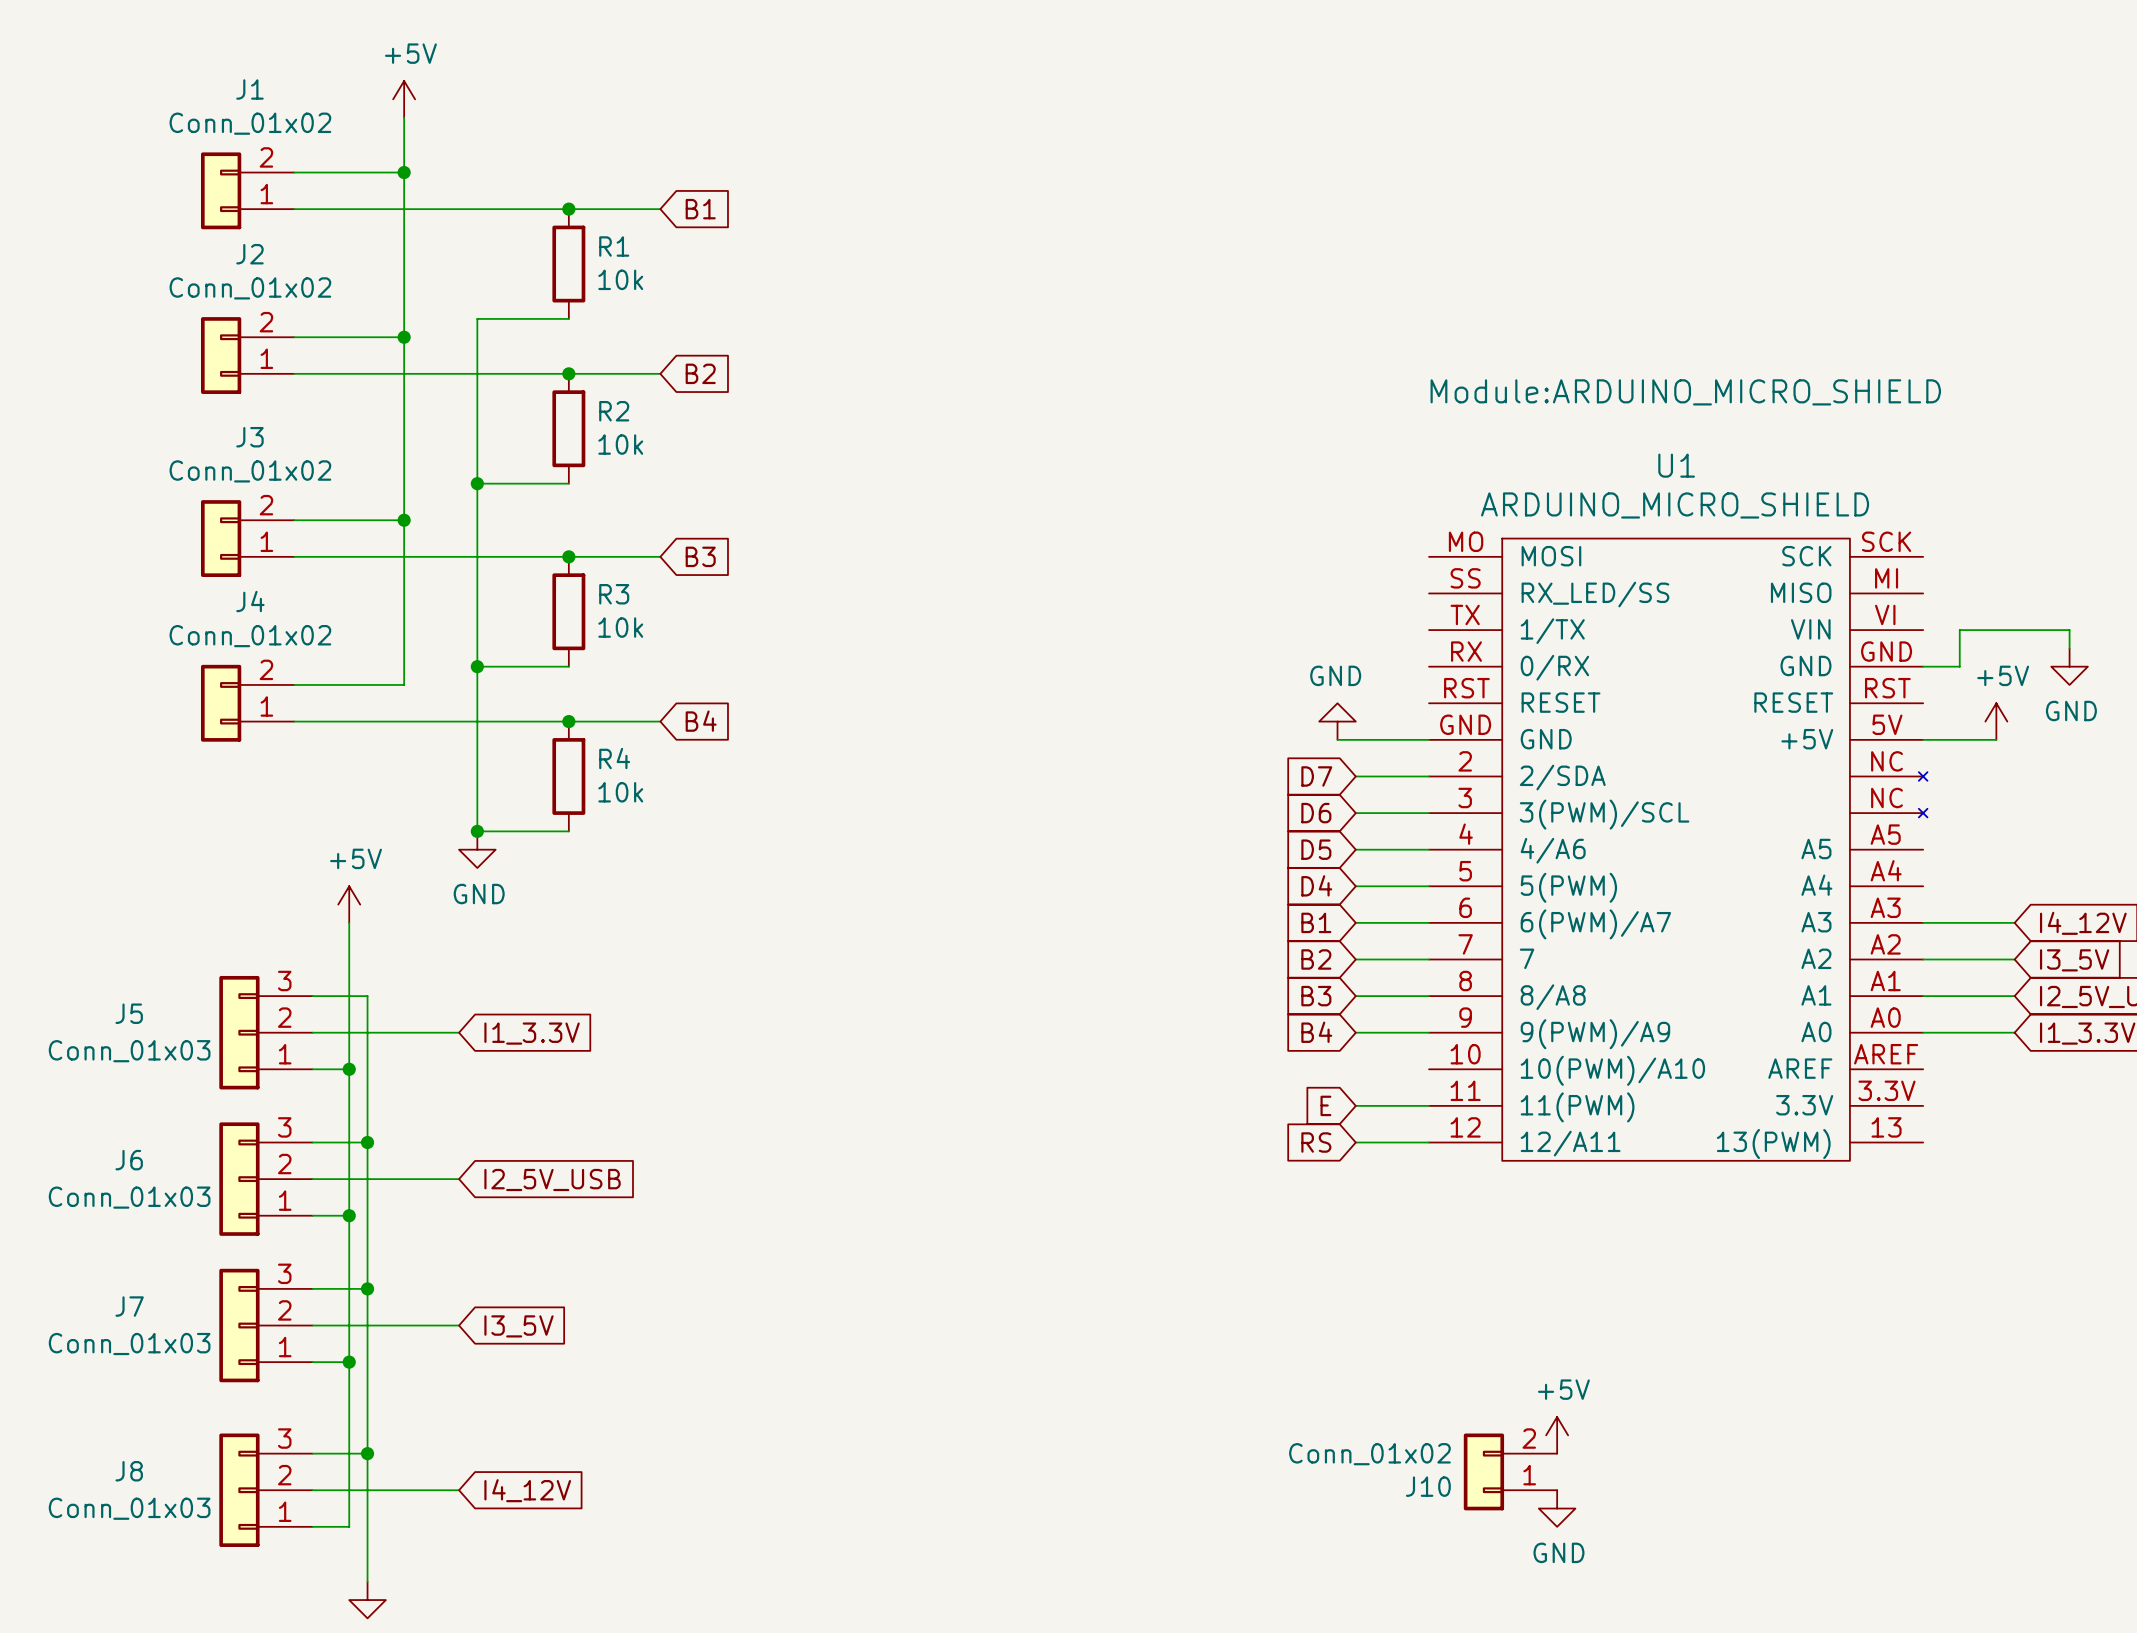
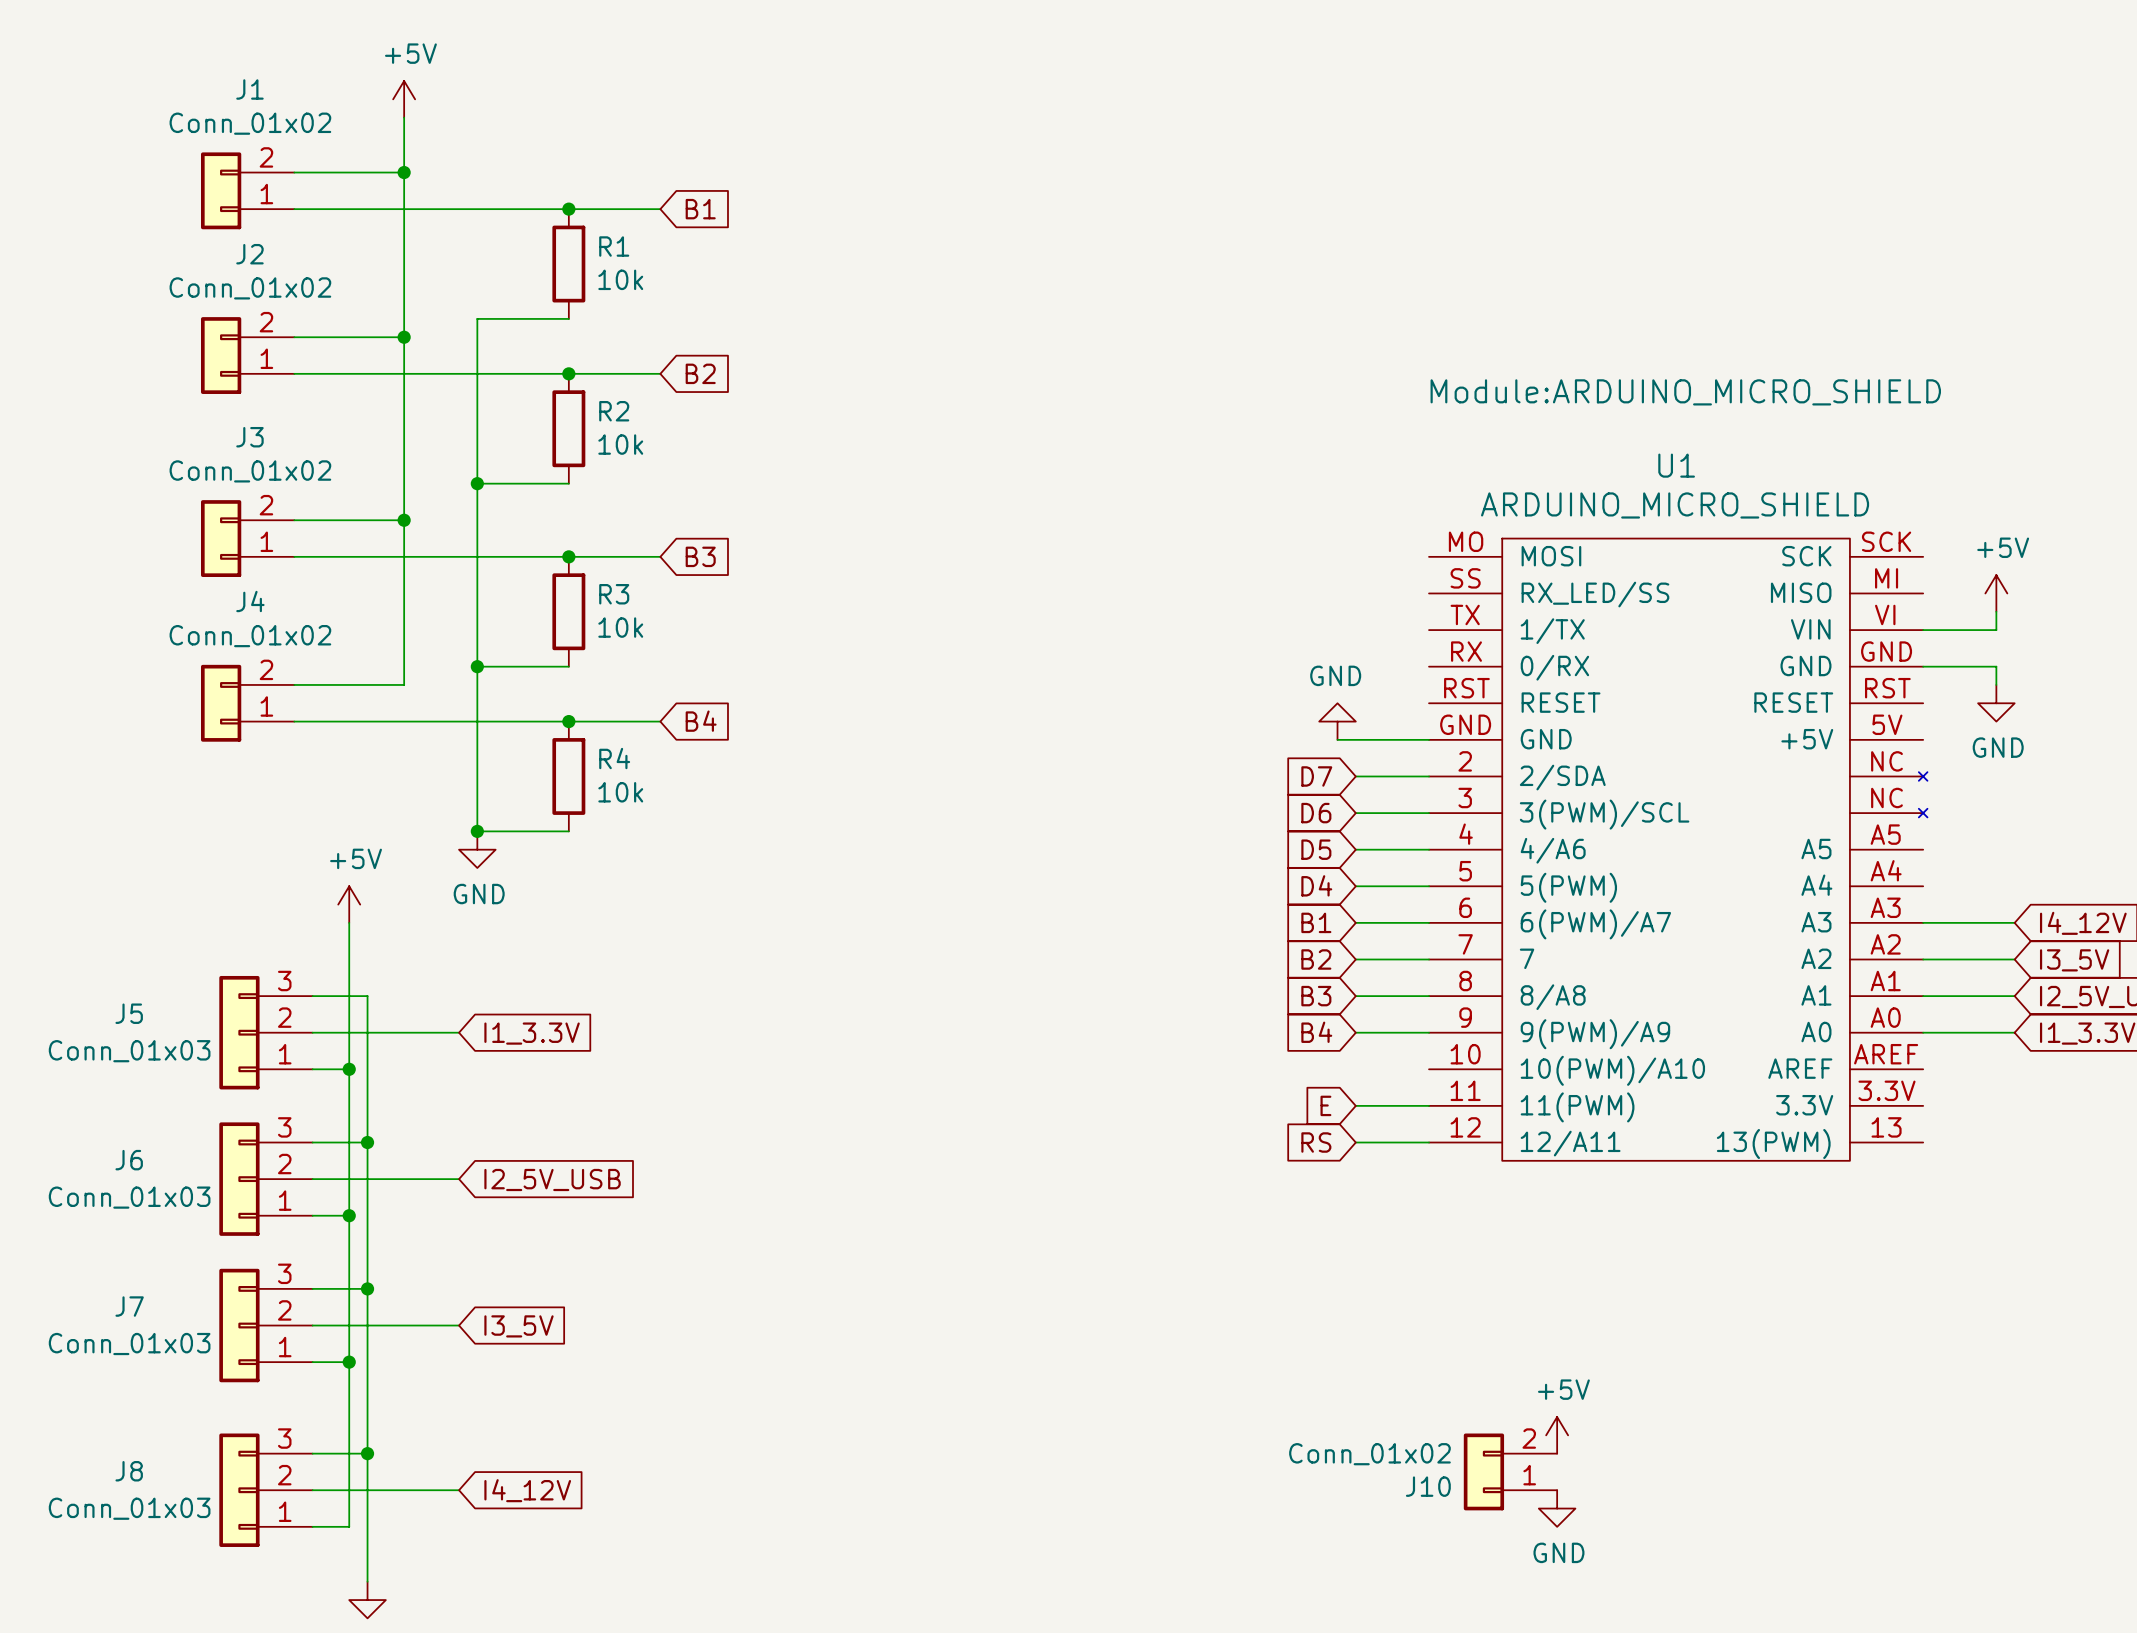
wire: (1959, 630) (1959, 666) -> (1959, 630) (1923, 630)
wire: (1996, 630) (2069, 630) (2069, 648) -> (1996, 630) (1996, 611)
wire: none -> (1959, 666) (1996, 666) (1996, 684)
power symbol position: GND (2069, 666) -> GND (1996, 703)
power symbol position: +5V (1996, 721) -> +5V (1996, 593)
wire: (1923, 739) (1996, 739) -> none

